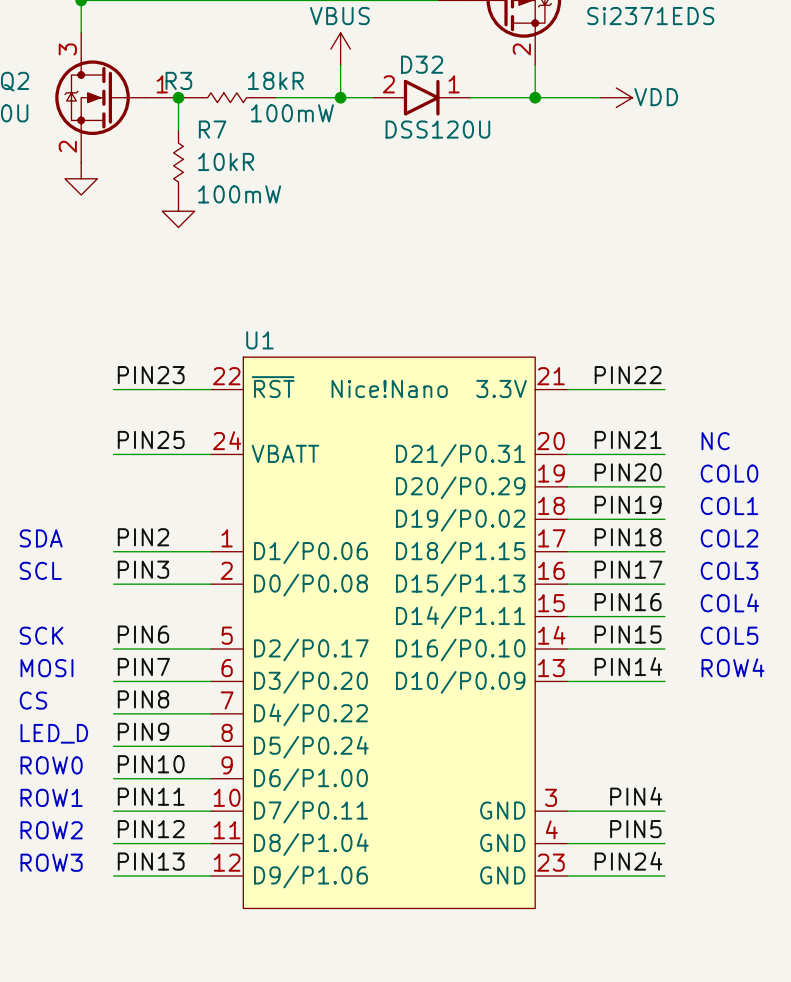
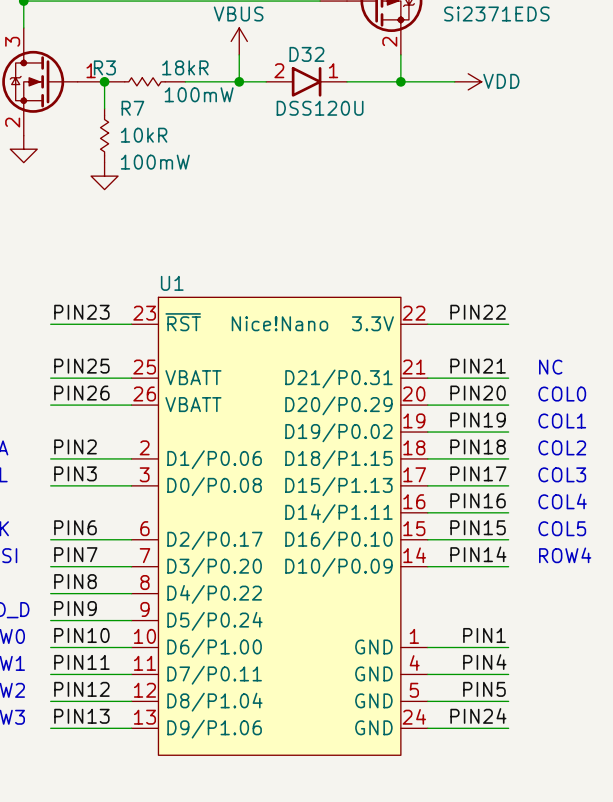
U1 symbol: [210, 357, 568, 909] -> [131, 297, 428, 756]
label: none -> PIN26 (81, 393)
wire: none -> (50, 405) (131, 405)
label: none -> PIN1 (484, 635)
wire: none -> (427, 647) (508, 647)

